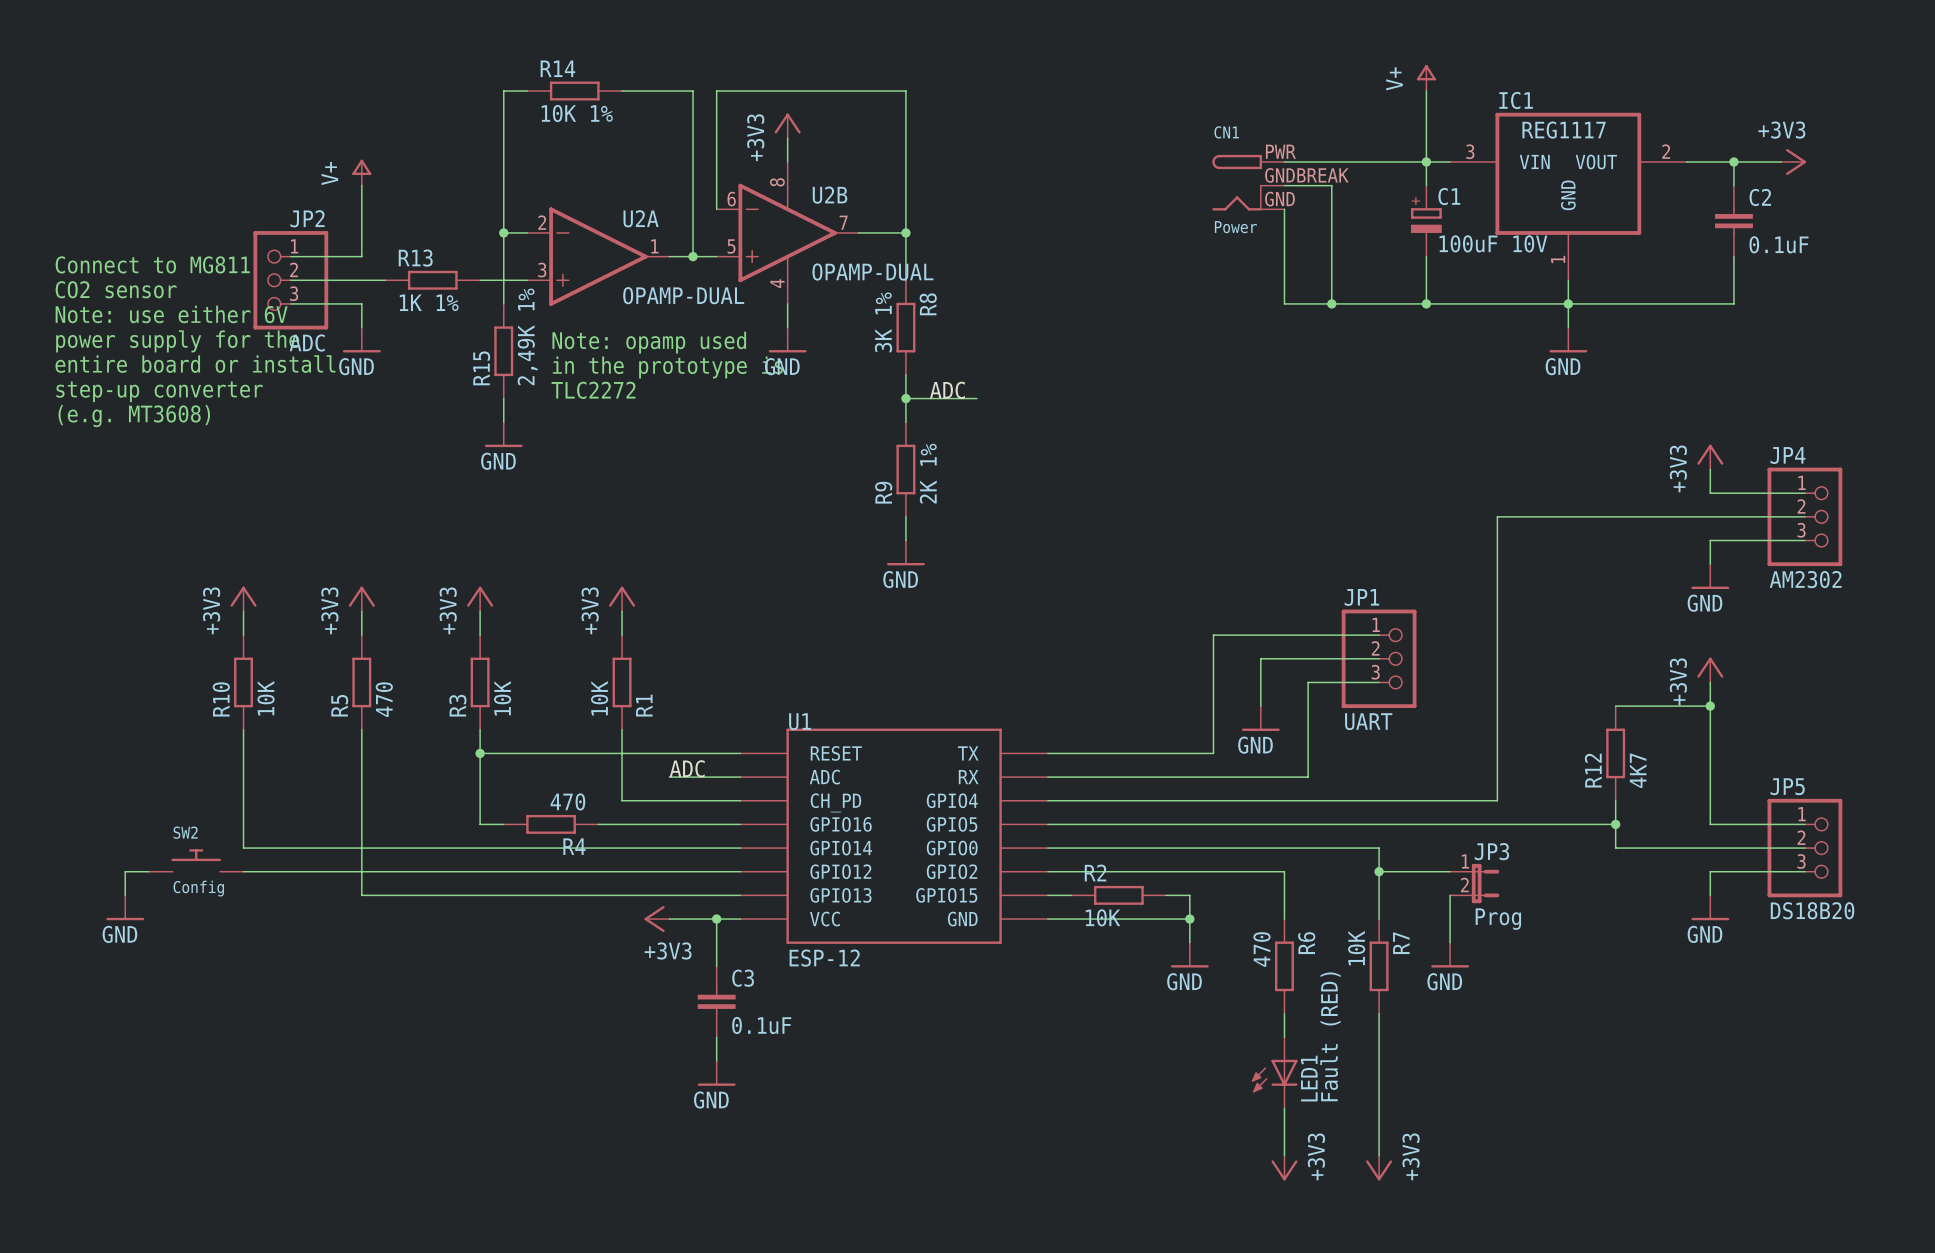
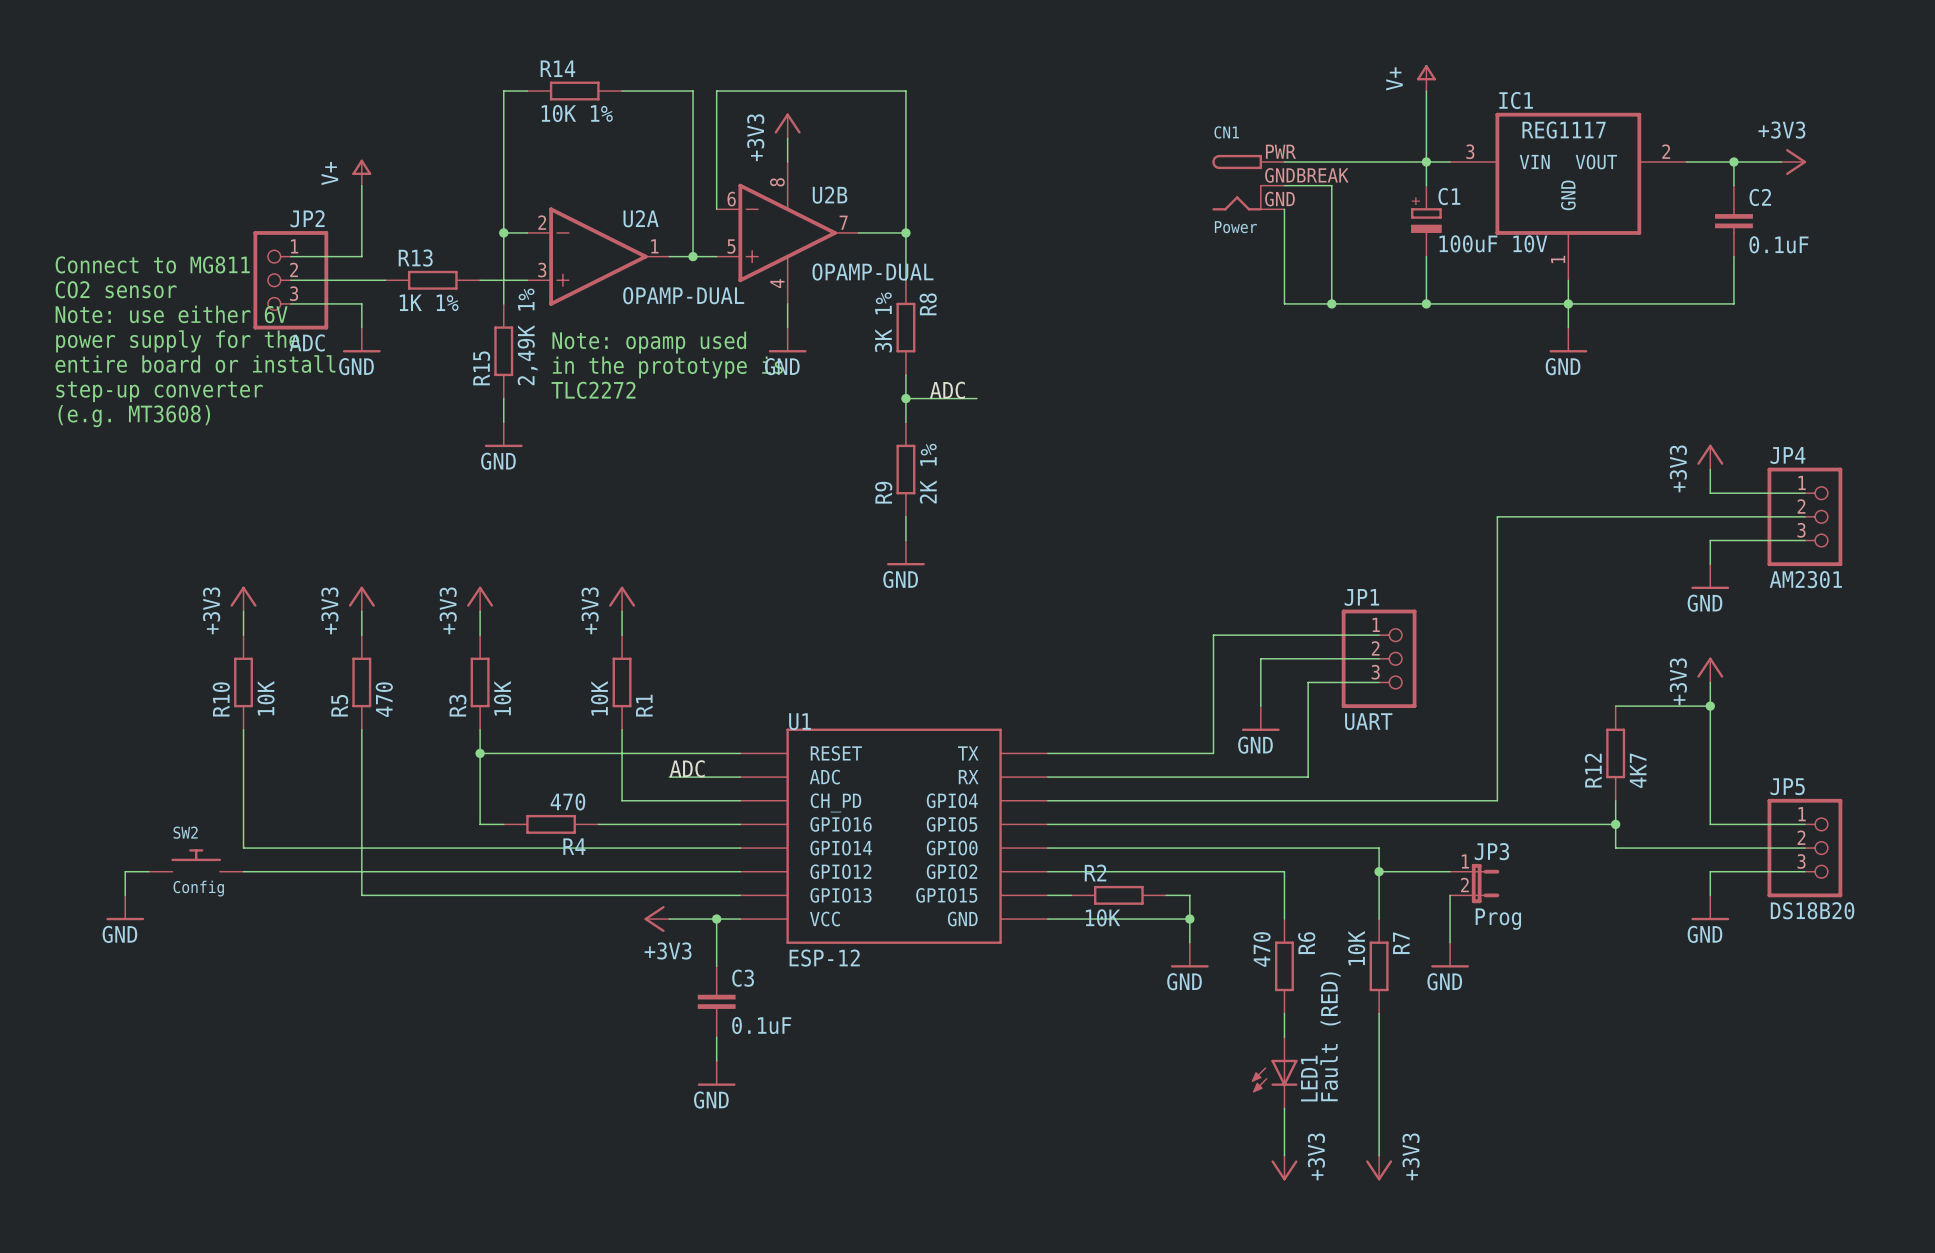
JP4 value: AM2302 (1805, 579) -> AM2301 (1805, 579)

